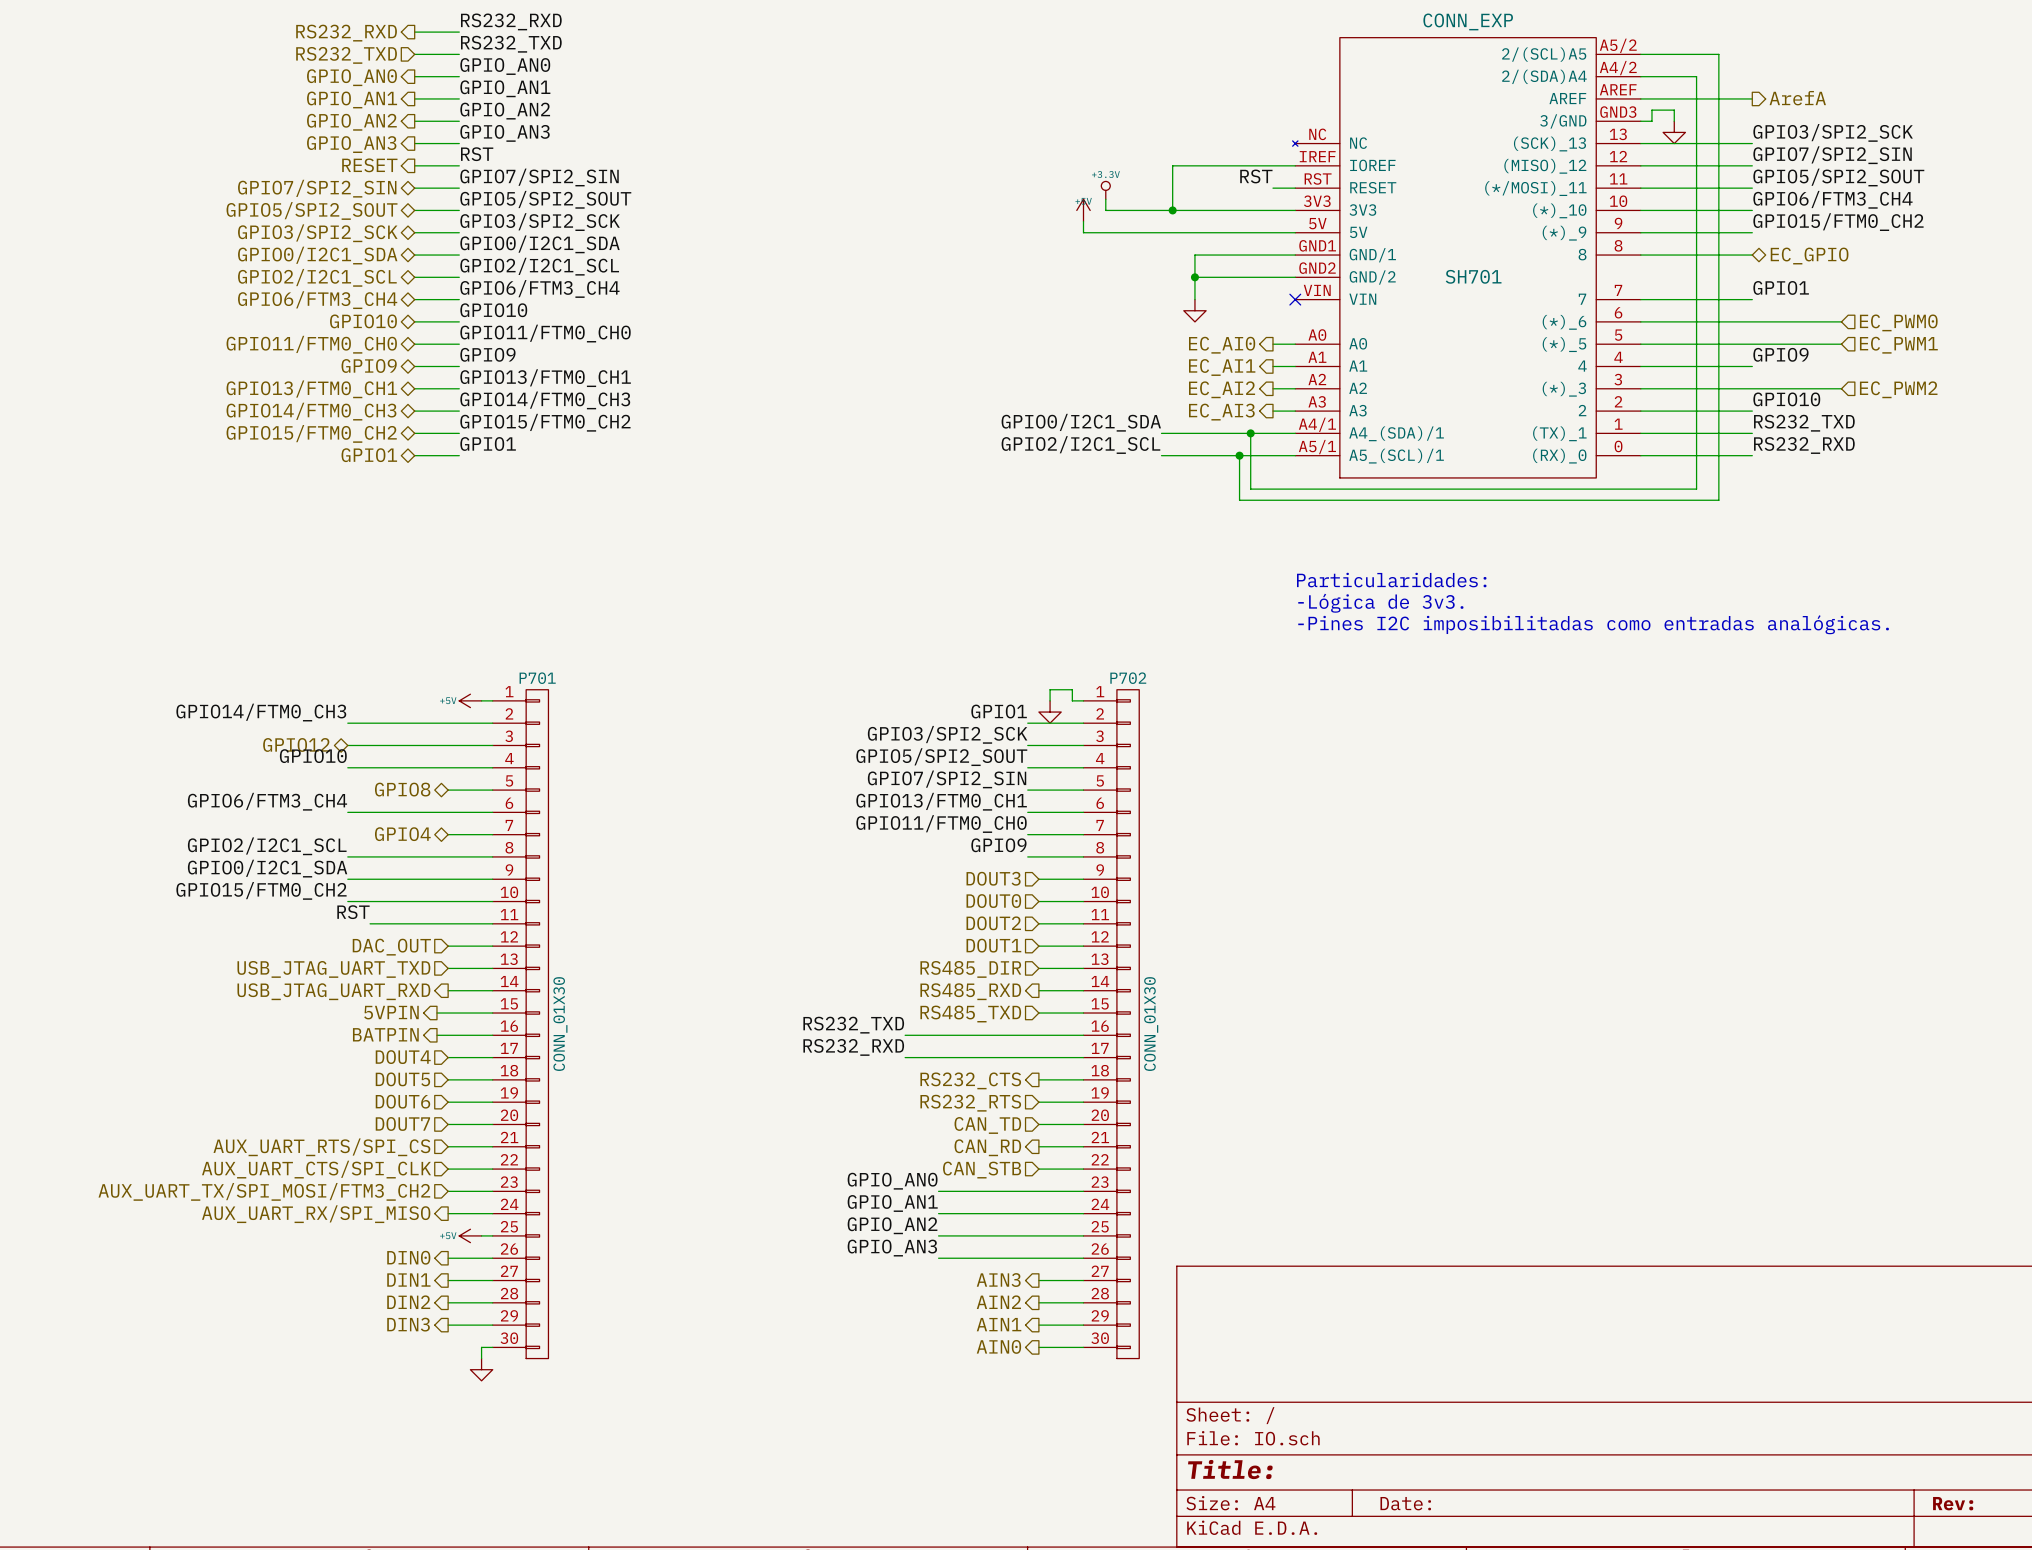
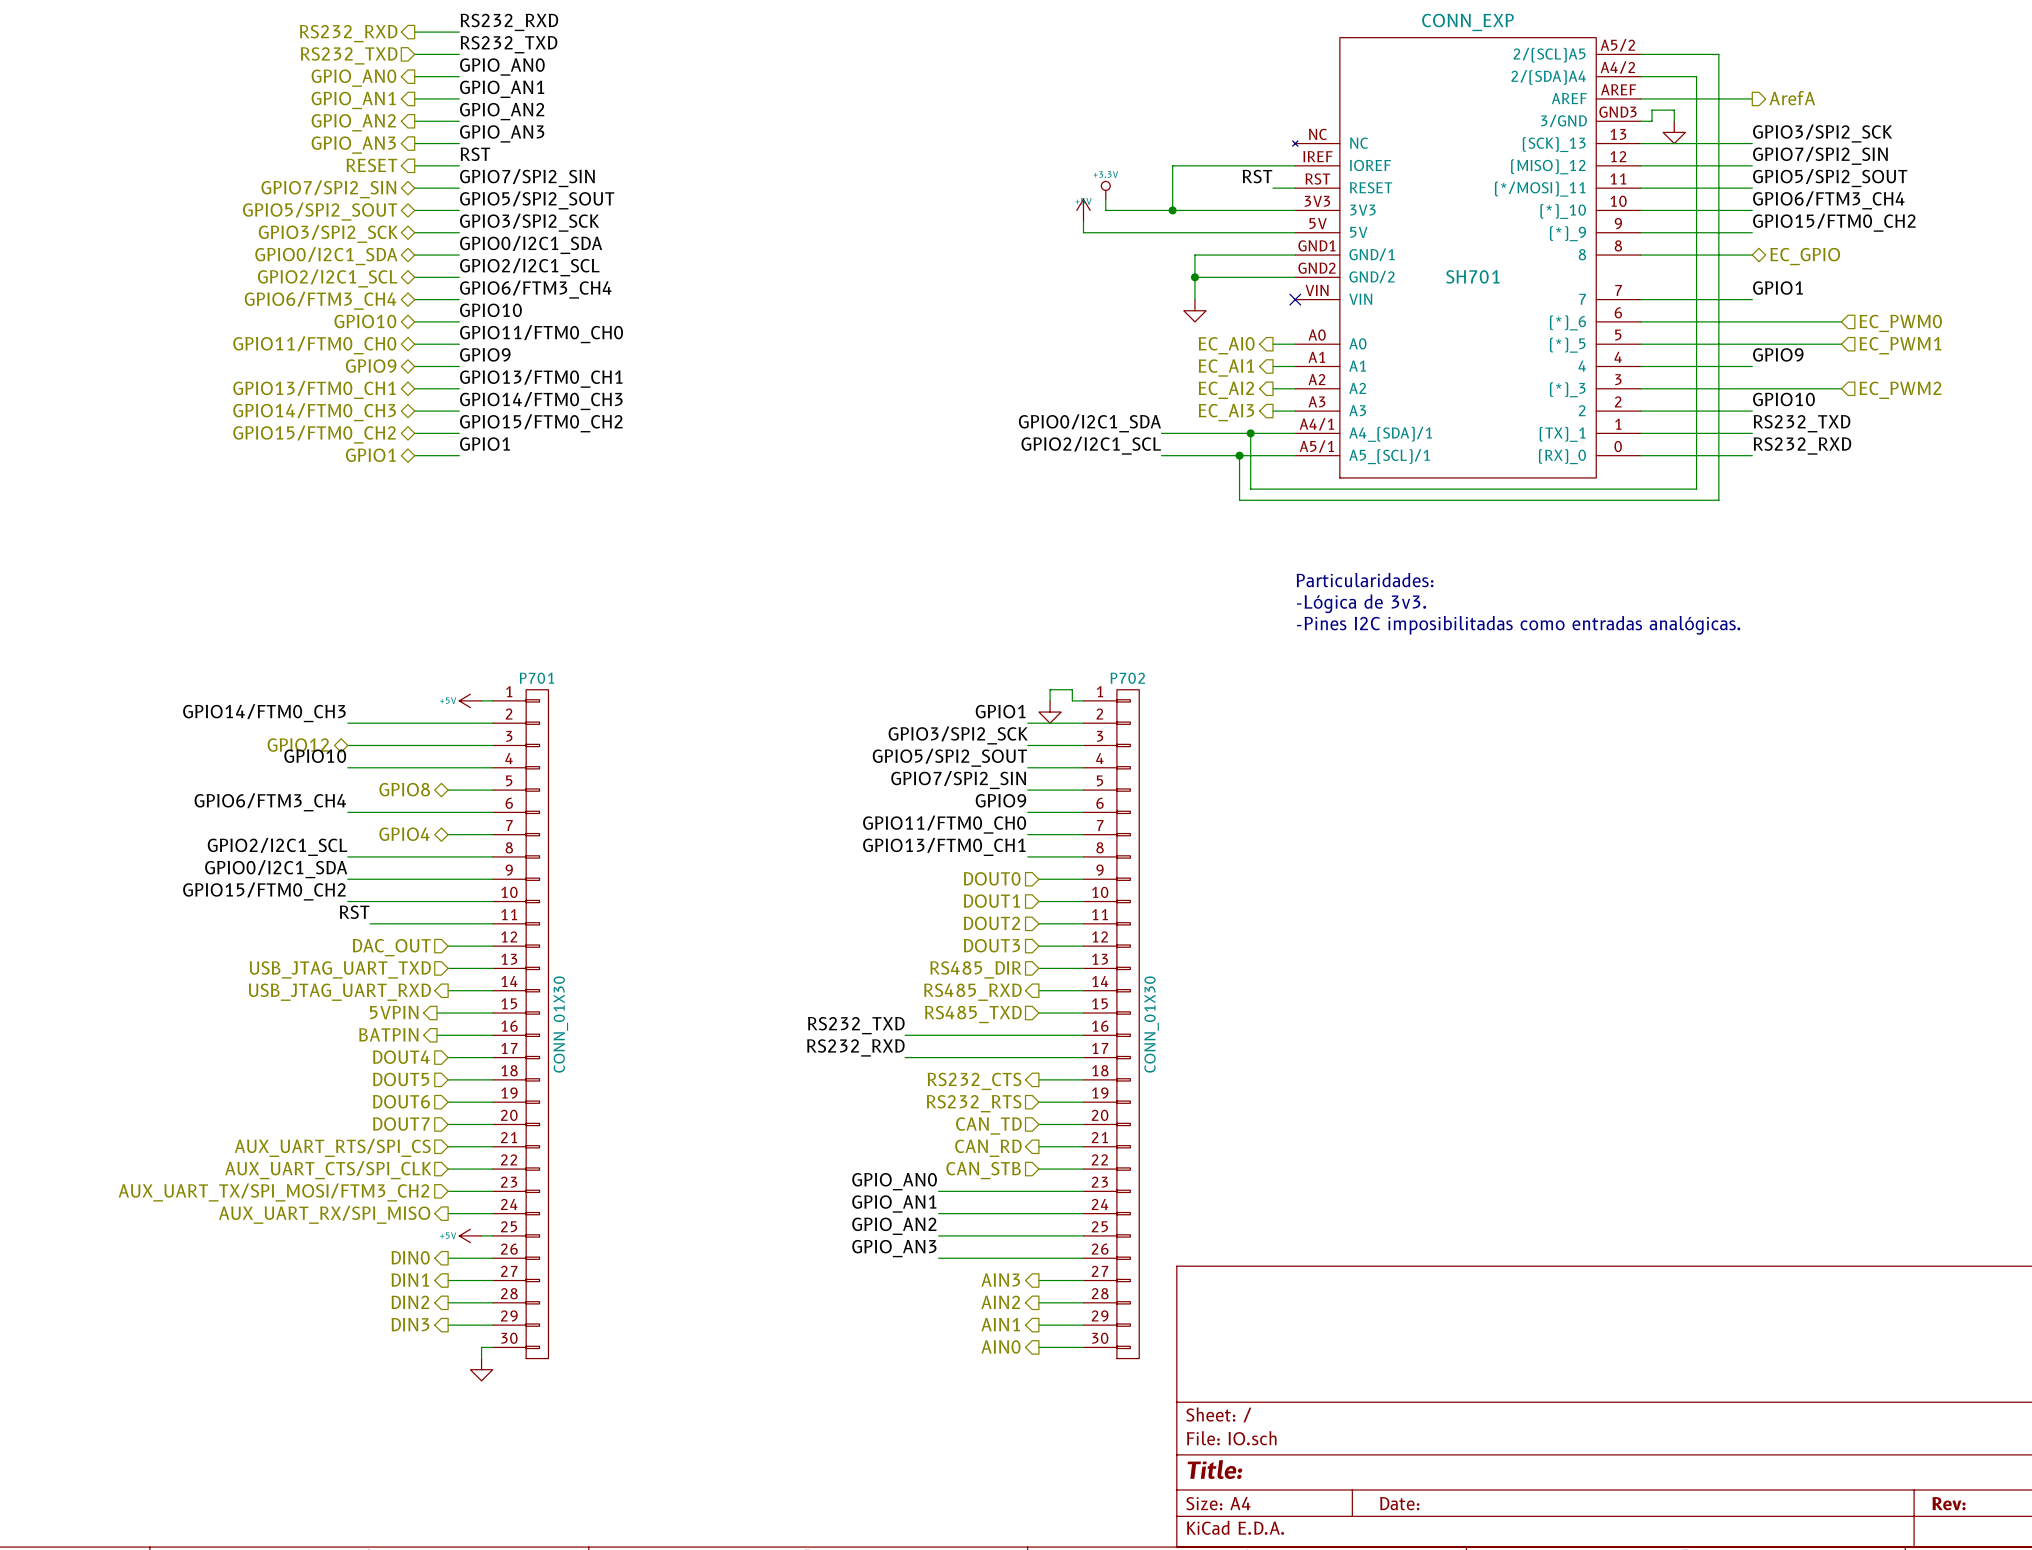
label: GPIO13/FTM0_CH1 (941, 801) -> GPIO9 (1000, 800)
label: GPIO9 (998, 845) -> GPIO13/FTM0_CH1 (944, 846)
hierarchical label: DOUT3 (993, 878) -> DOUT0 (992, 878)
hierarchical label: DOUT0 (993, 901) -> DOUT1 (991, 901)
hierarchical label: DOUT1 (993, 945) -> DOUT3 (991, 945)

